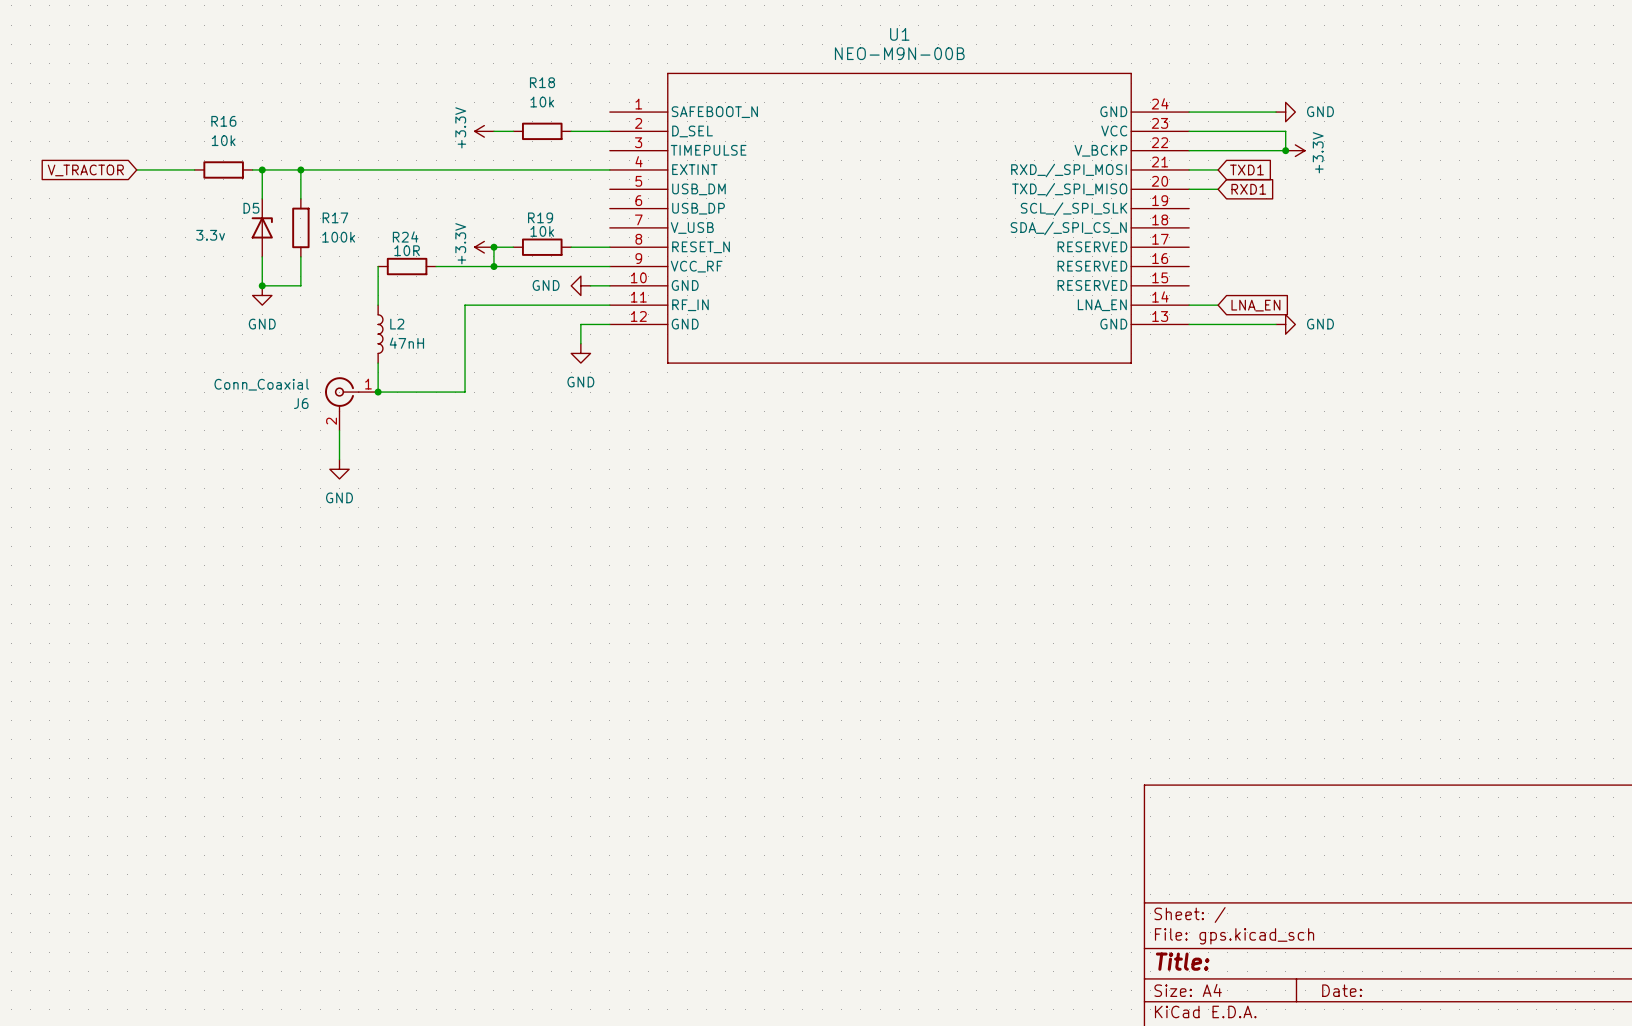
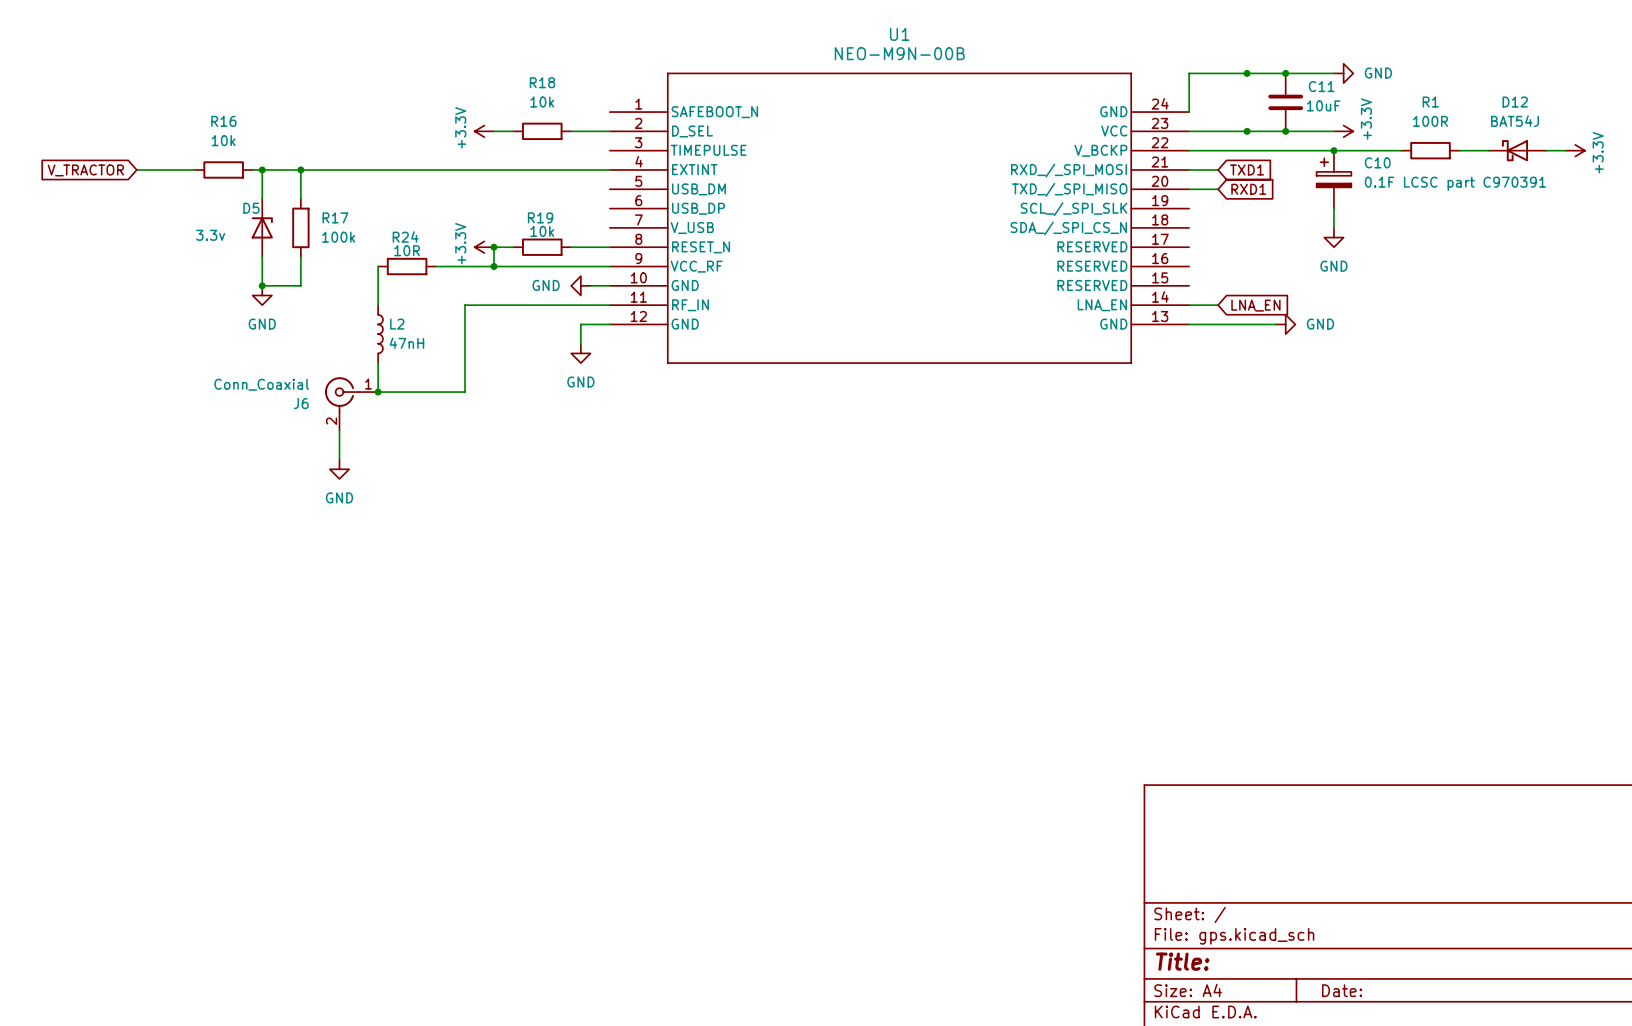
junction: none -> (1247, 73)
junction: none -> (1285, 73)
power symbol: none -> GND (1343, 73)
C11: none -> 10uF (1285, 102)
wire: (1189, 112) (1276, 112) -> (1189, 112) (1189, 73) (1333, 73)
power symbol: GND (1285, 112) -> none
junction: none -> (1247, 131)
wire: (1285, 131) (1285, 150) -> (1285, 131) (1333, 131)
wire: none -> (1285, 150) (1401, 150)
junction position: (1285, 150) -> (1285, 131)
power symbol position: +3.3V (1295, 150) -> +3.3V (1343, 131)
junction: none -> (1333, 150)
R1: none -> 100R (1430, 150)
wire: none -> (1459, 150) (1488, 150)
D12: none -> BAT54J (1517, 150)
wire: none -> (1546, 150) (1565, 150)
power symbol: none -> +3.3V (1575, 150)
power symbol text position: +3.3V (1318, 152) -> +3.3V (1366, 119)
C10: none -> 0.1F LCSC part C970391 (1333, 179)
wire: none -> (1333, 208) (1333, 227)
power symbol: none -> GND (1333, 237)

